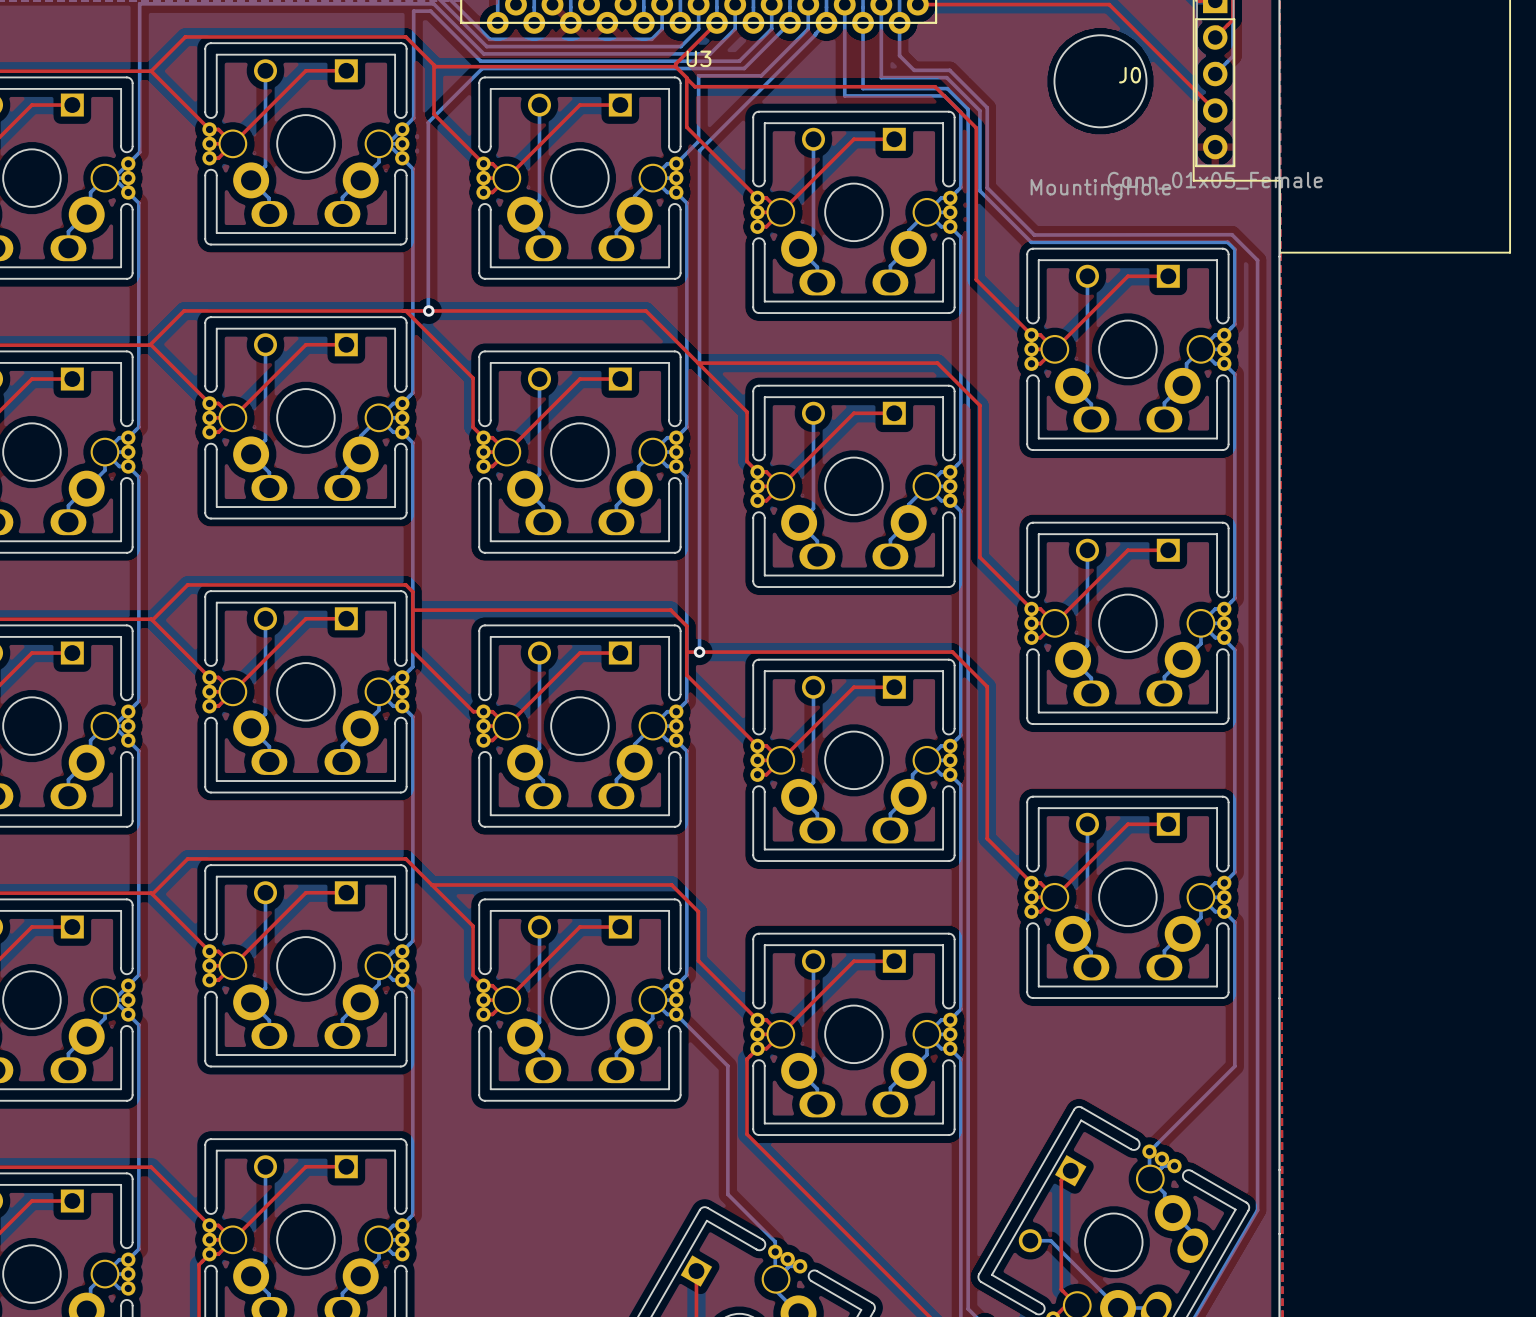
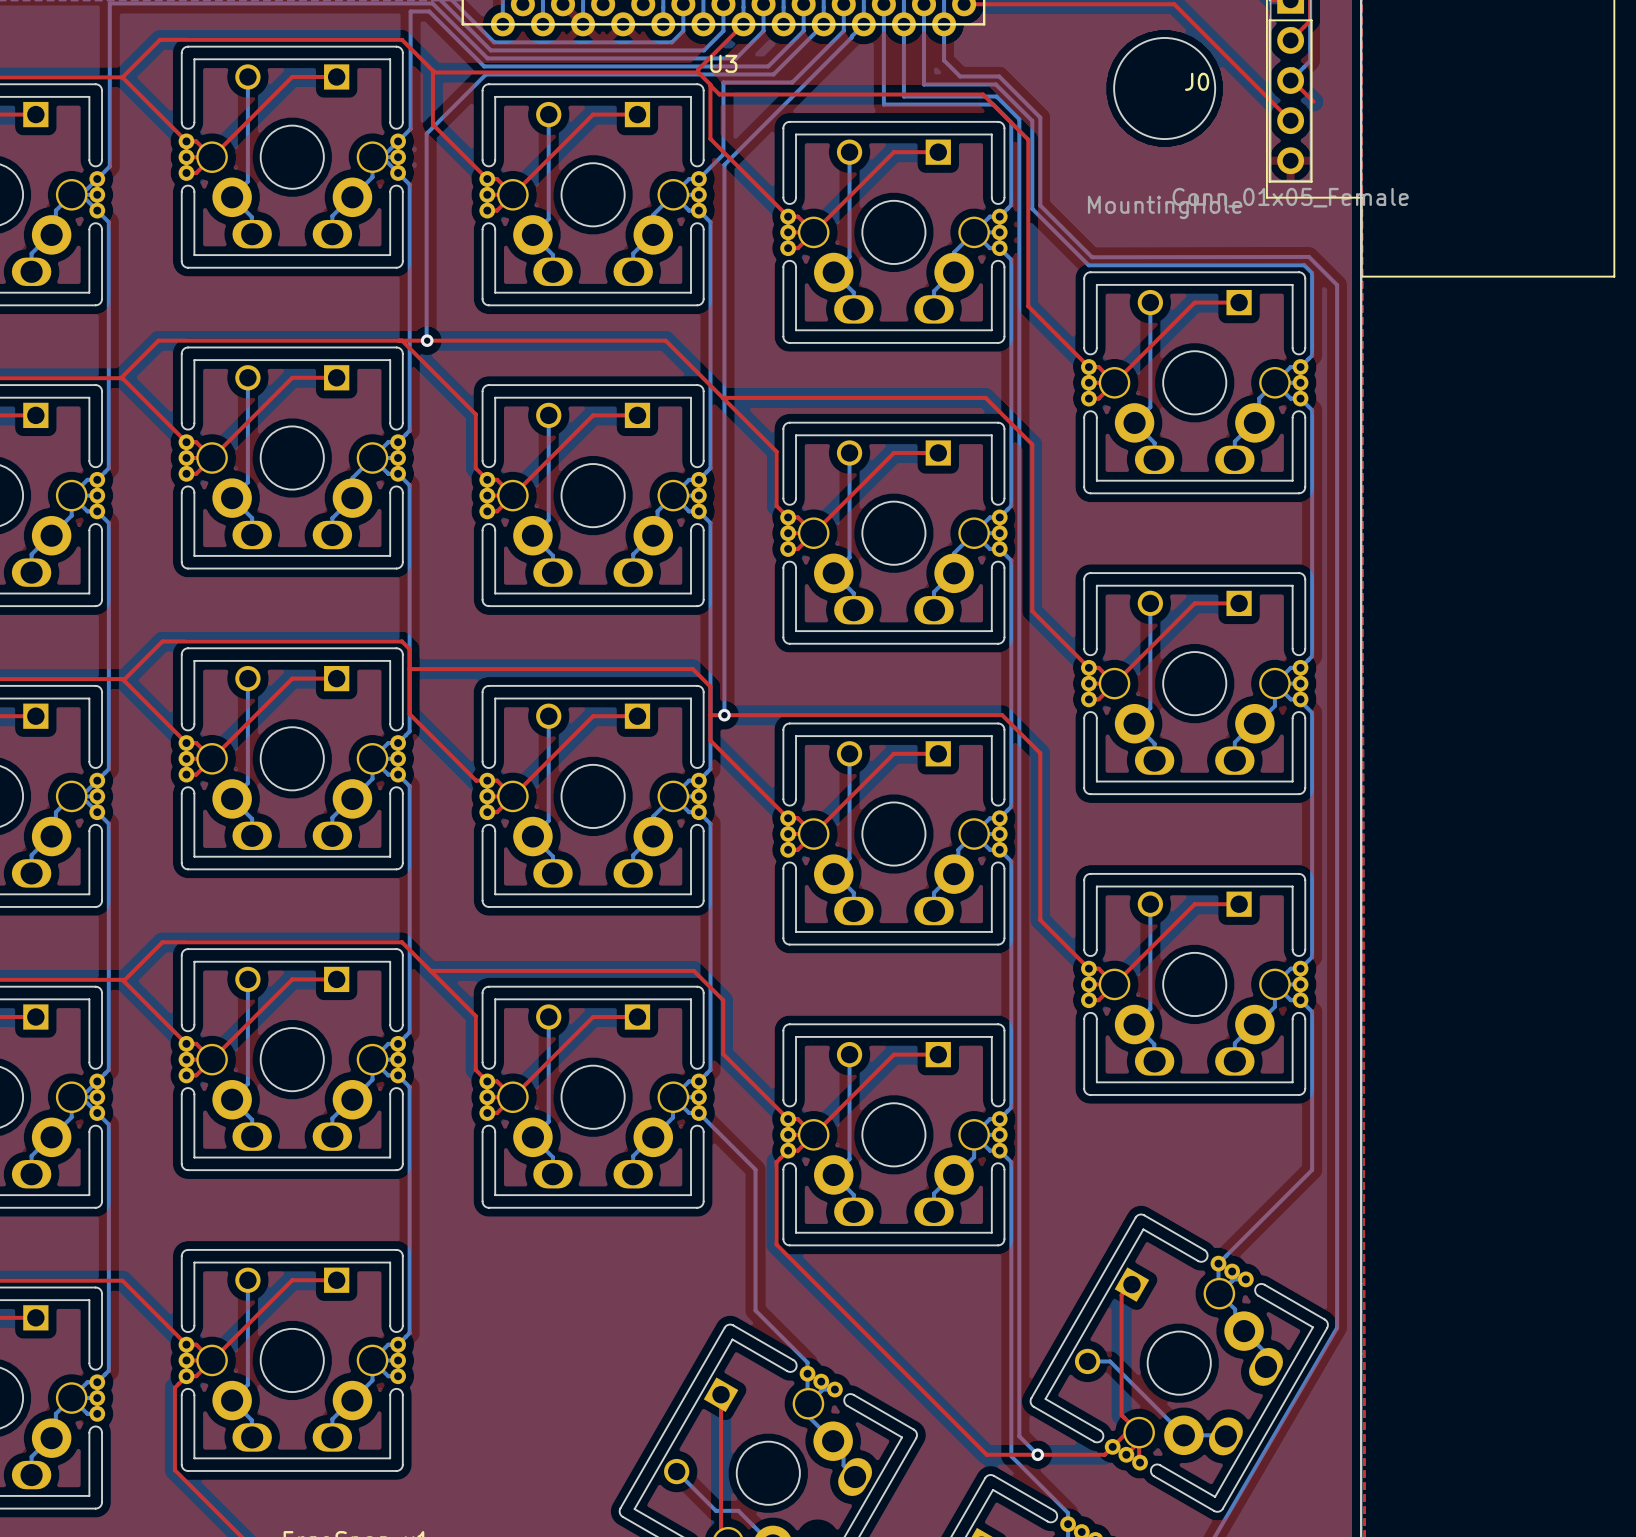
top track: none -> (1290, 80) (1313, 101)

